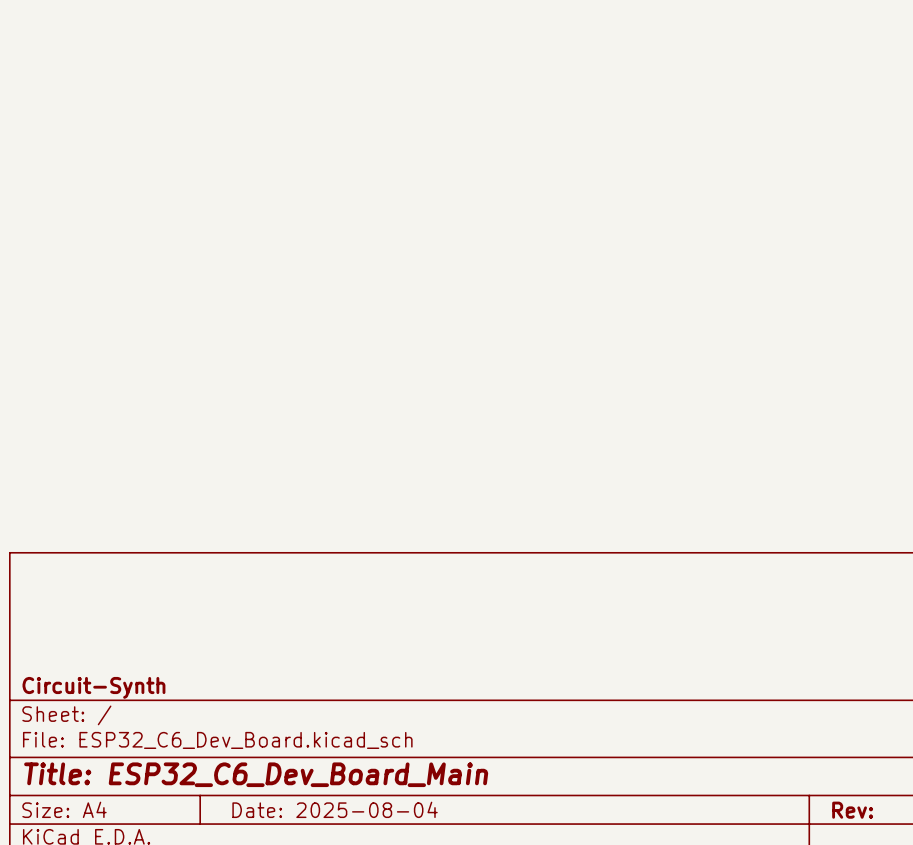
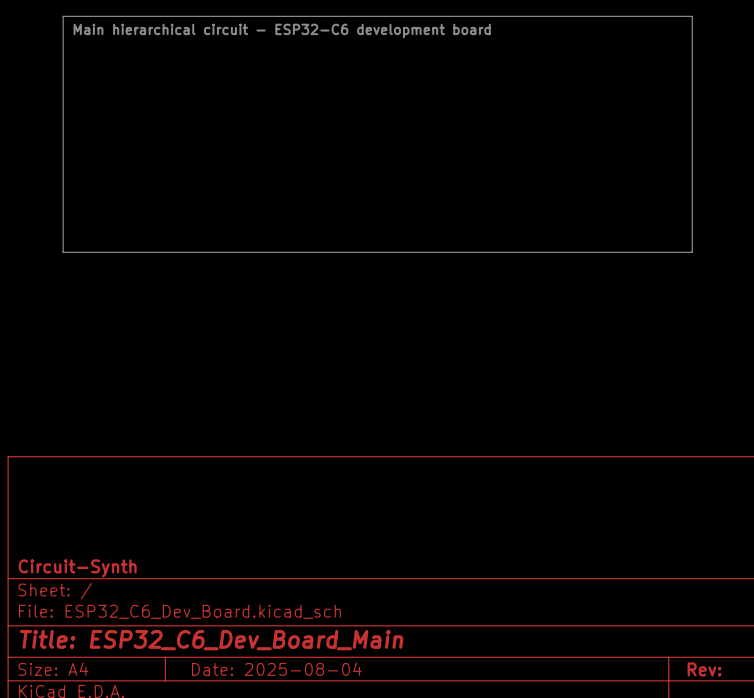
line: none -> (63, 16) (692, 16) (692, 252) (63, 252) (63, 16)
text: none -> Main hierarchical circuit - ESP32-C6 development board (282, 30)

